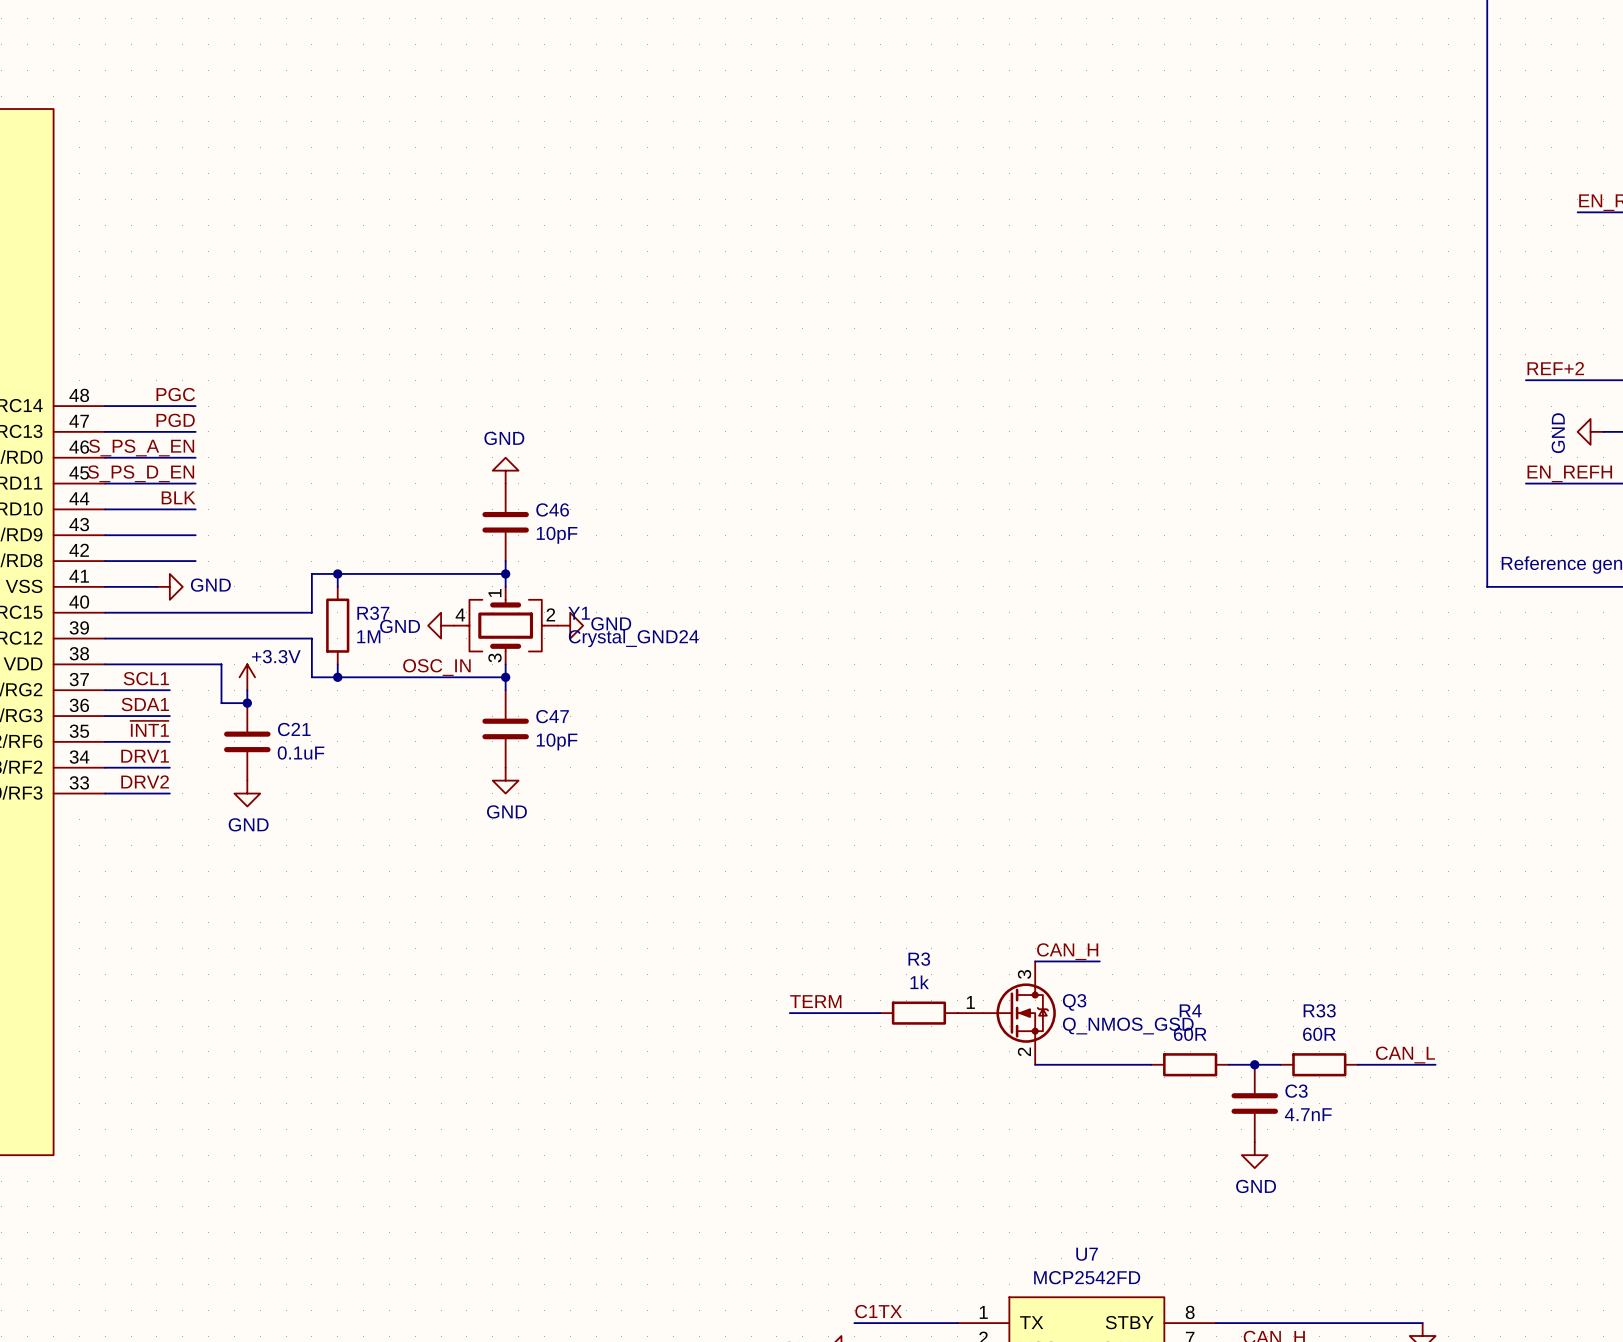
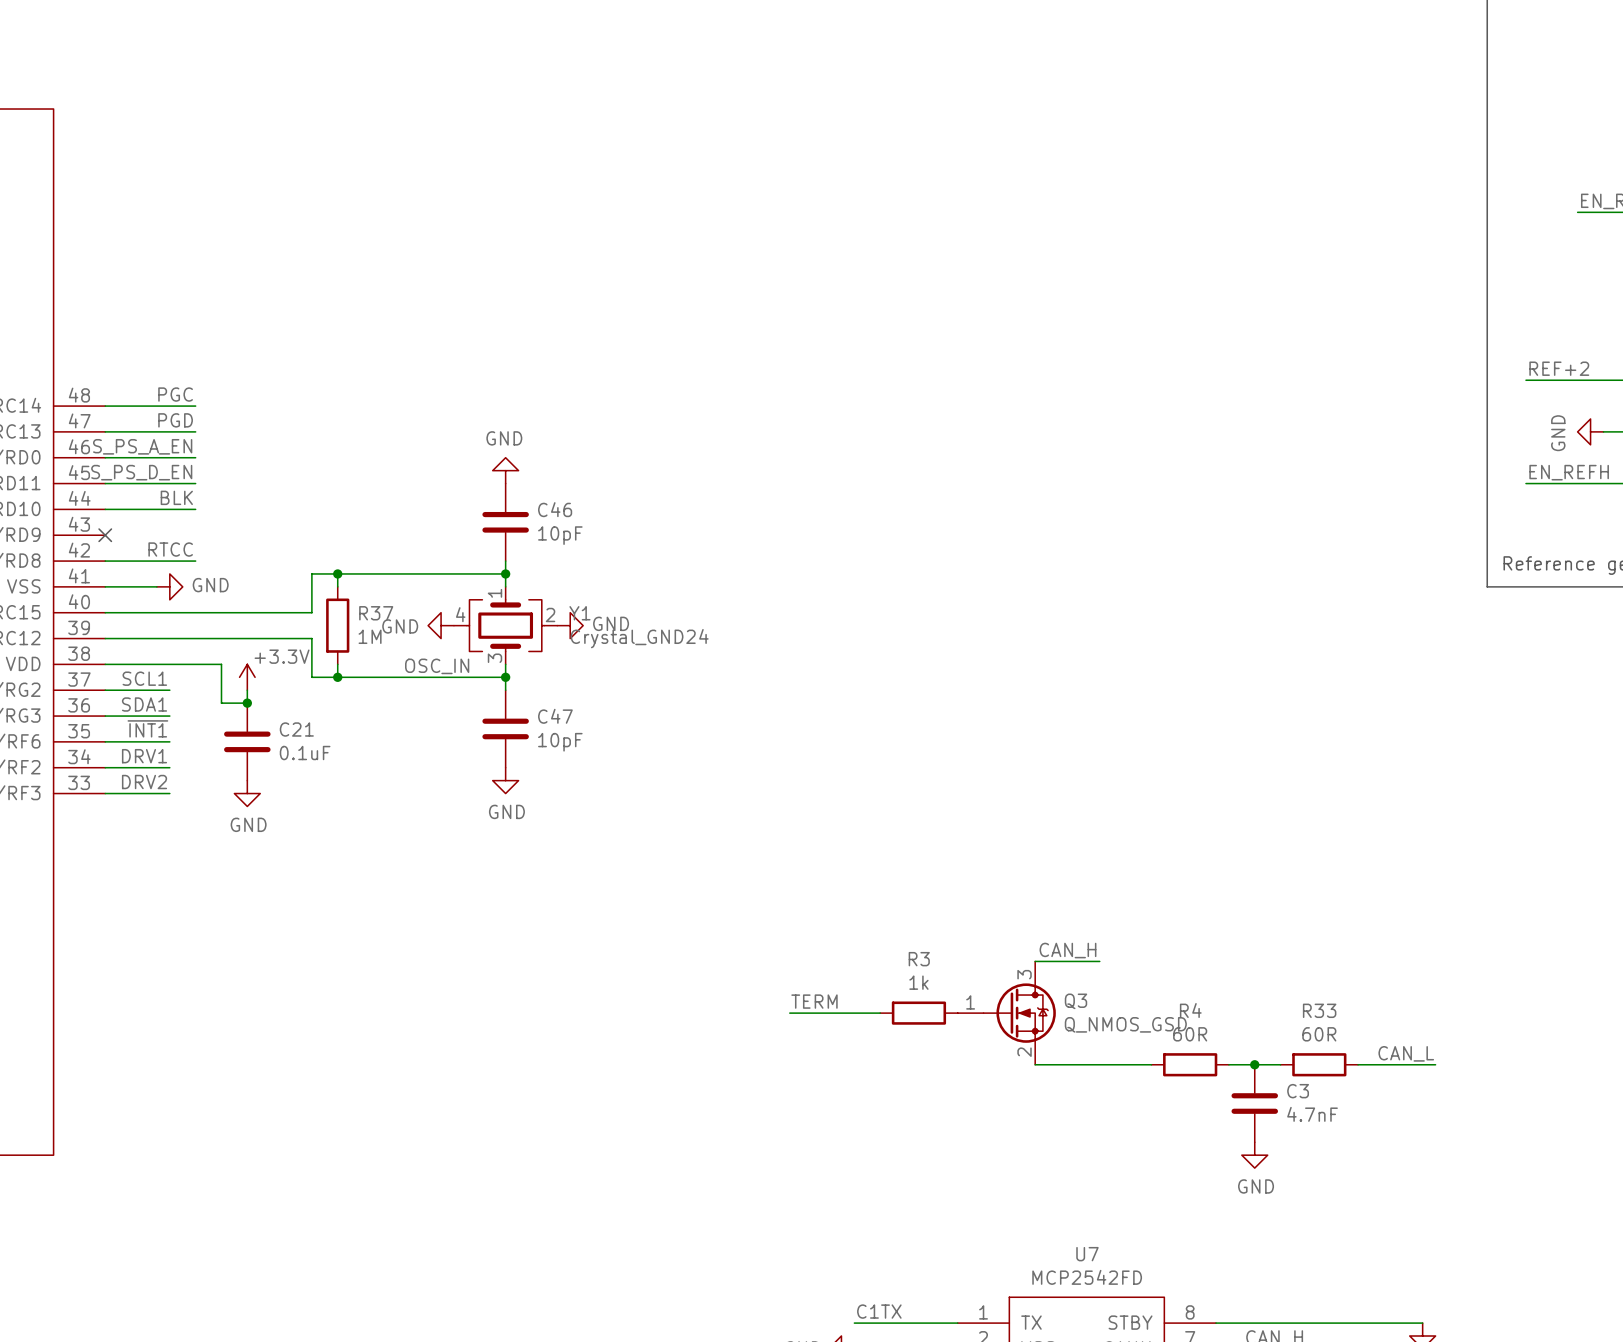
wire: (105, 535) (195, 535) -> none
no-connect mark: none -> (105, 535)
label: none -> RTCC (170, 549)

